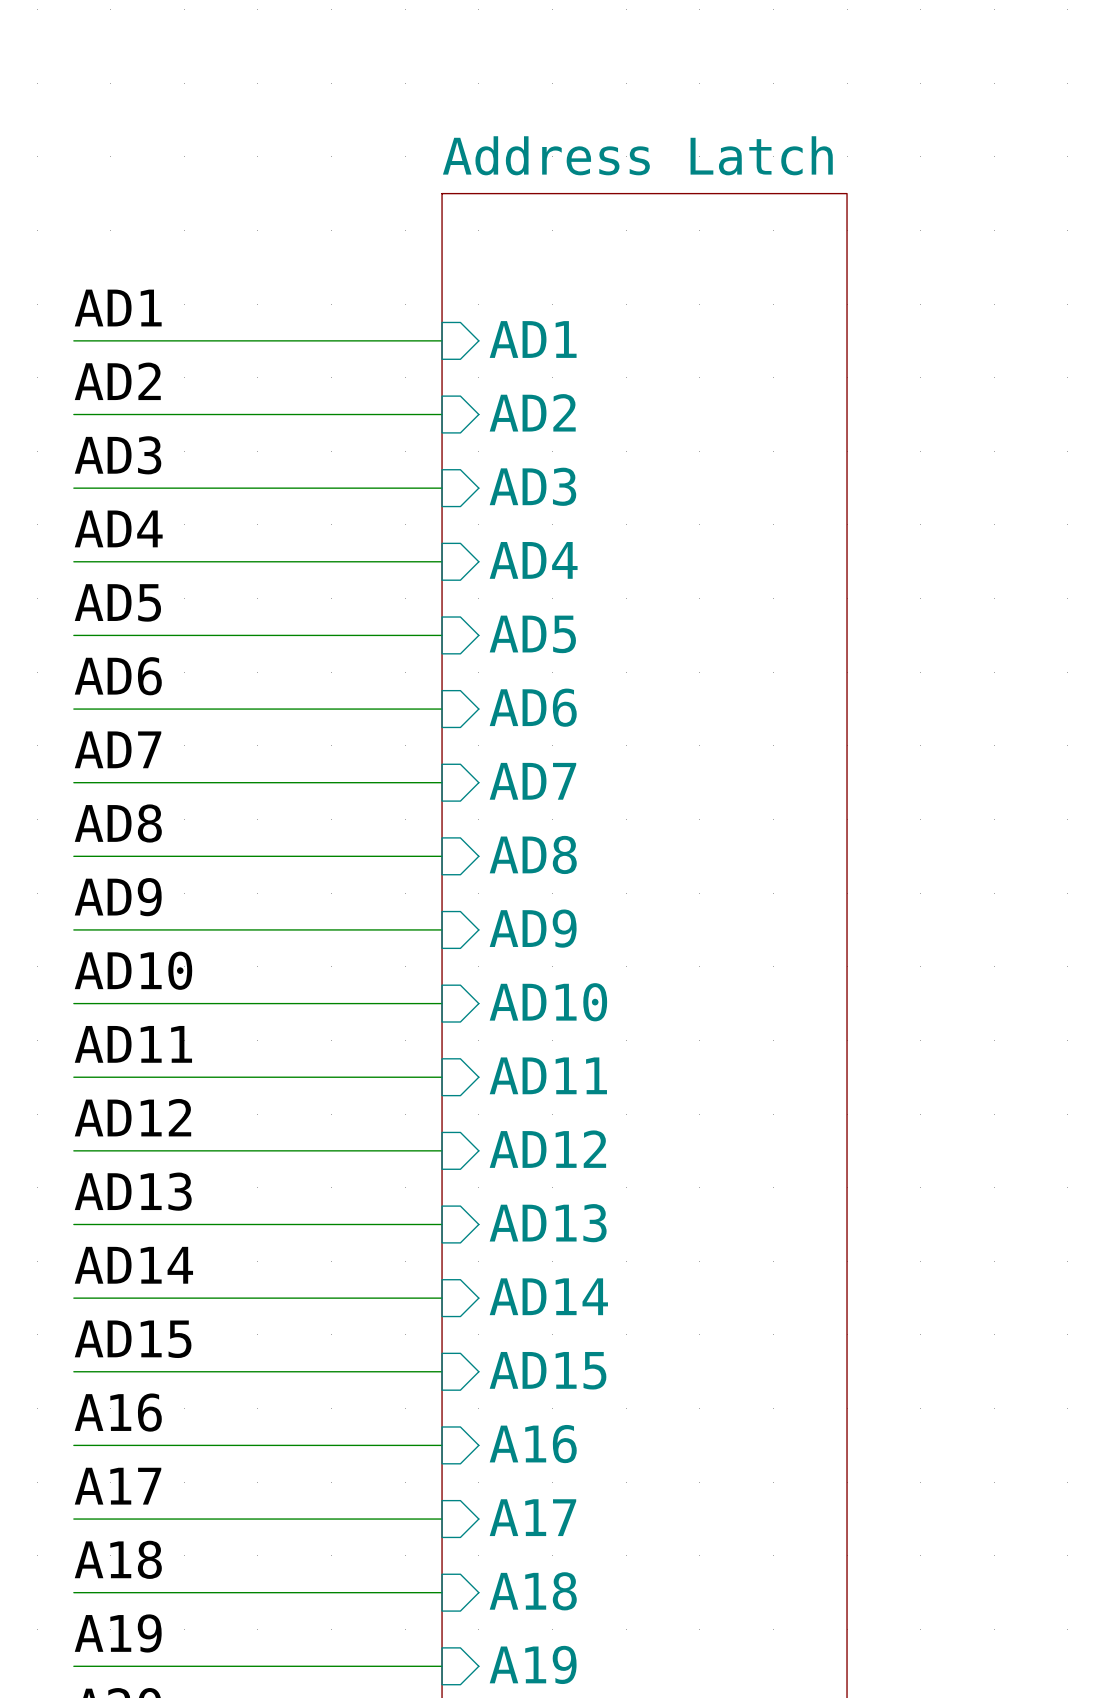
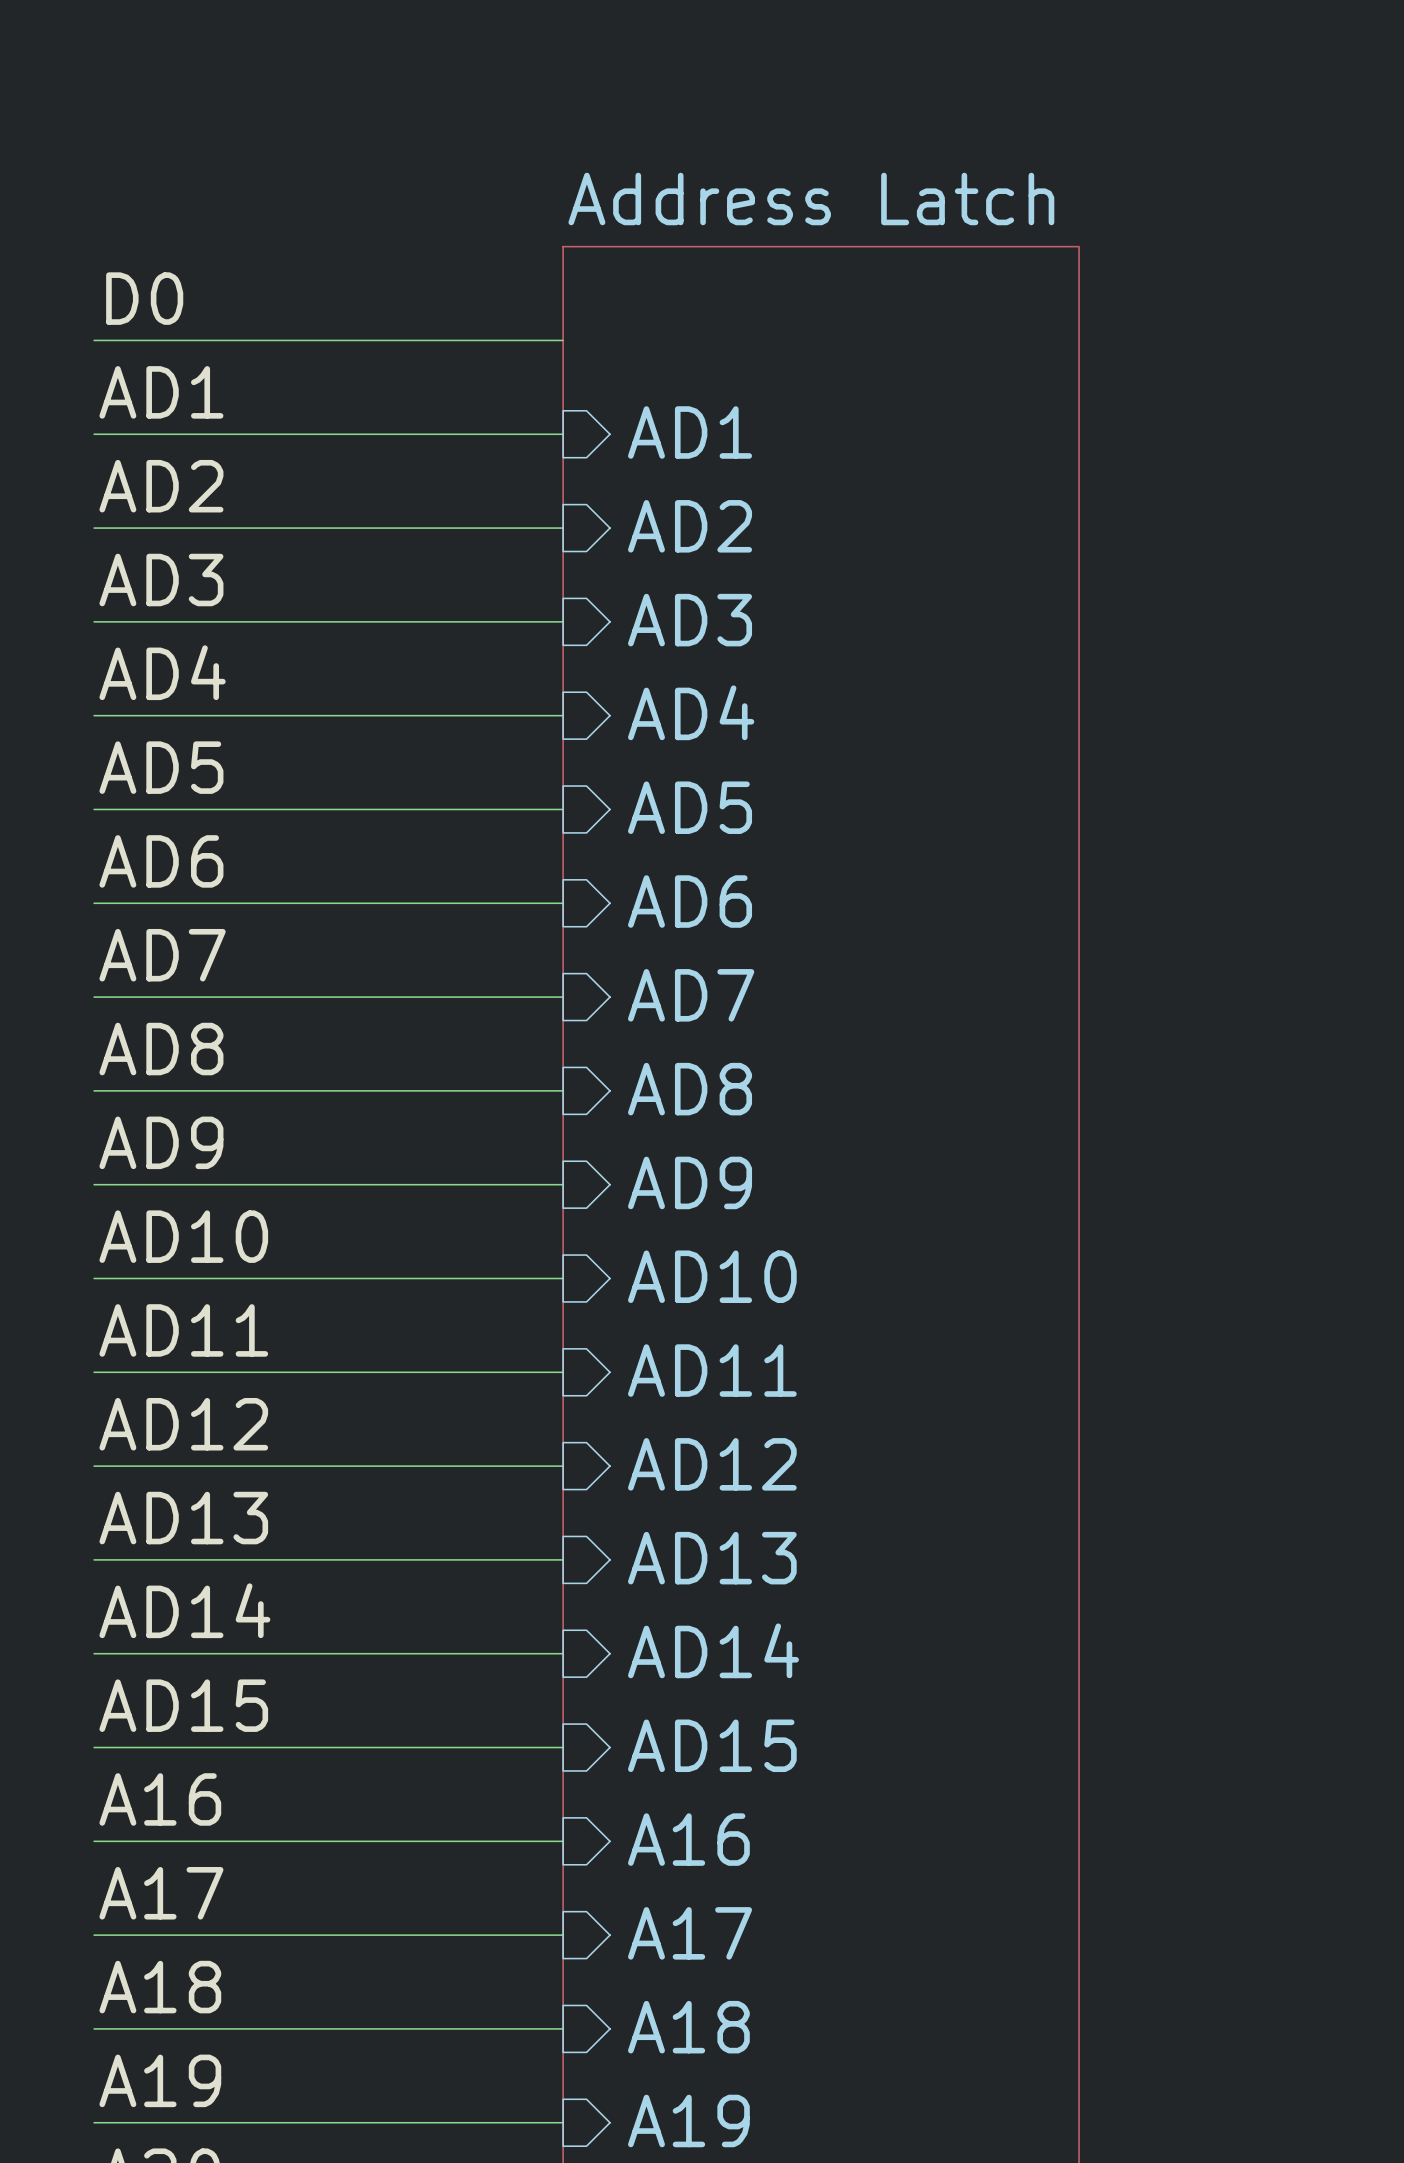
label: none -> D0 (144, 298)
wire: none -> (94, 340) (563, 340)

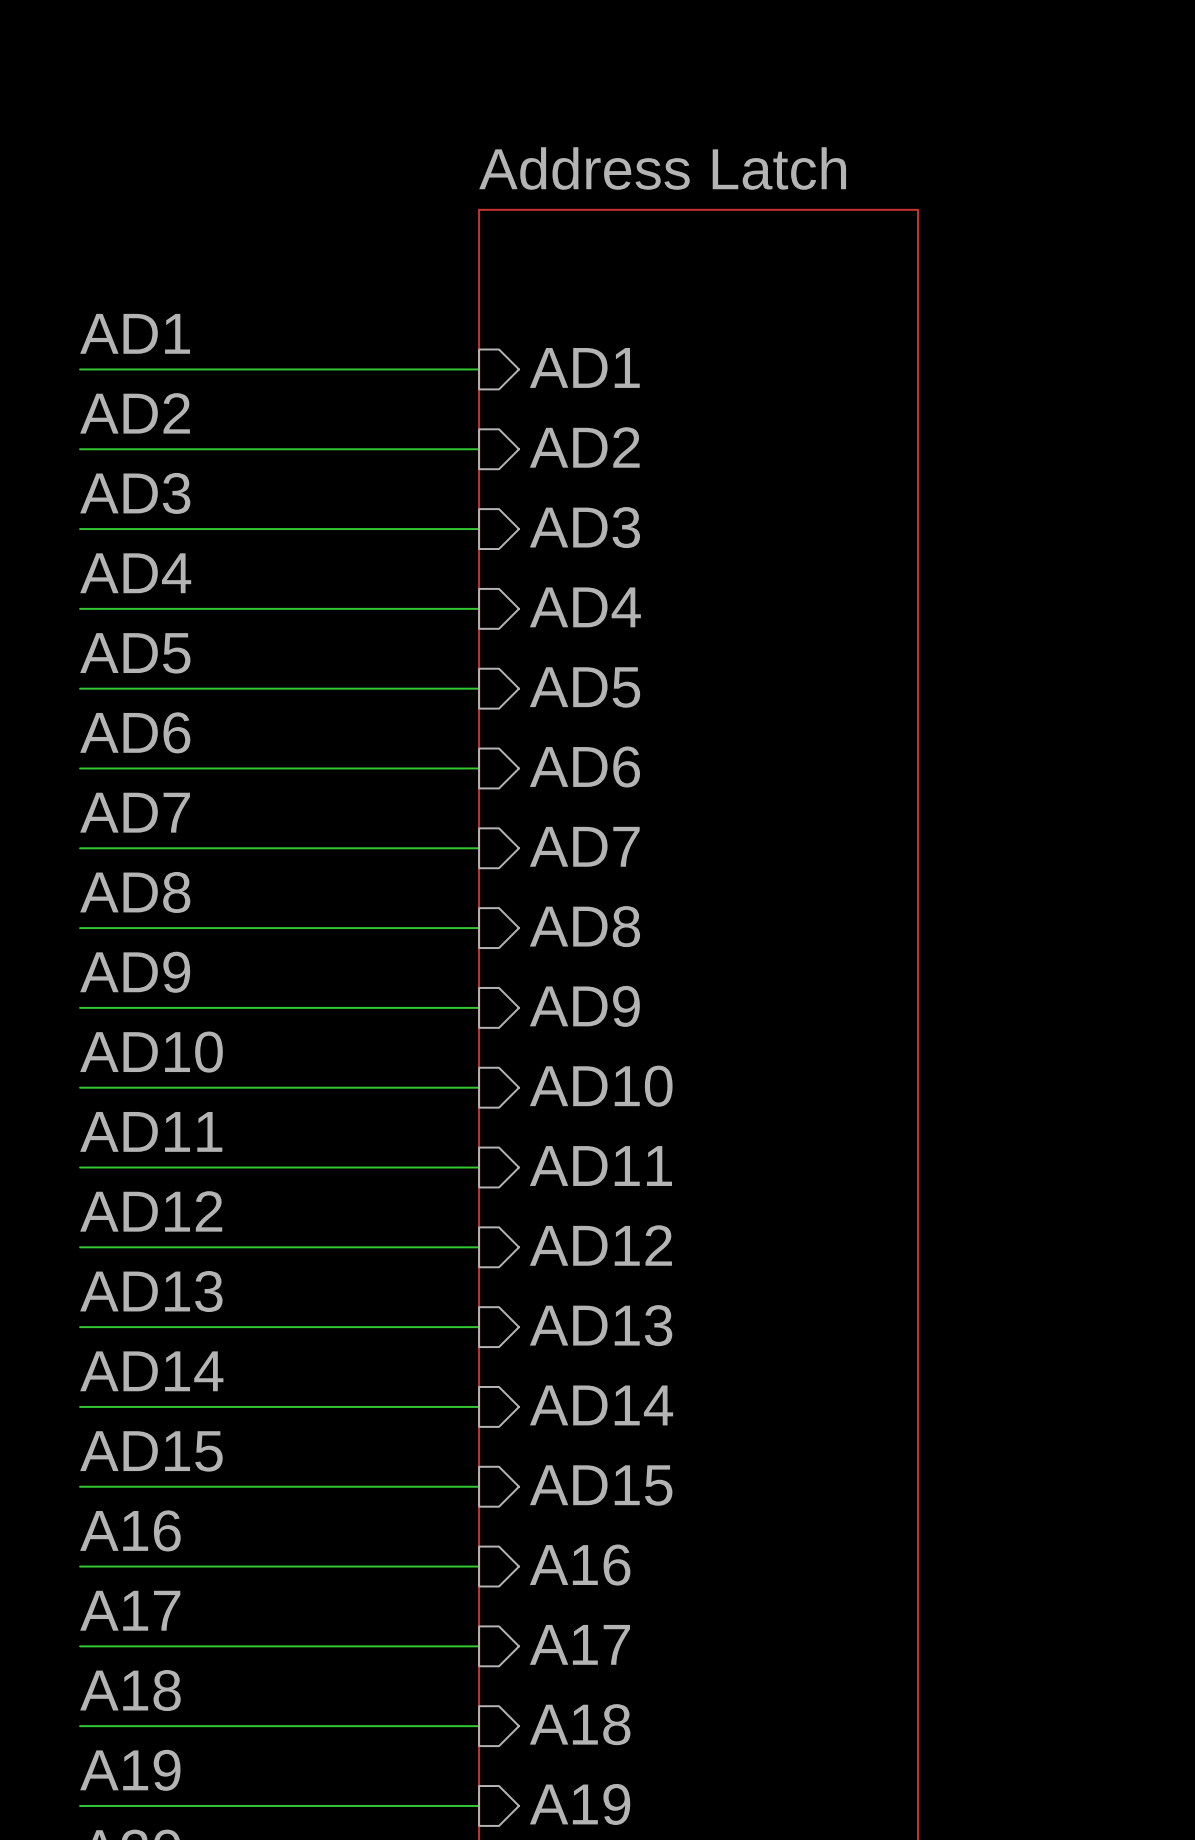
label: D0 (144, 298) -> none
wire: (94, 340) (563, 340) -> none

